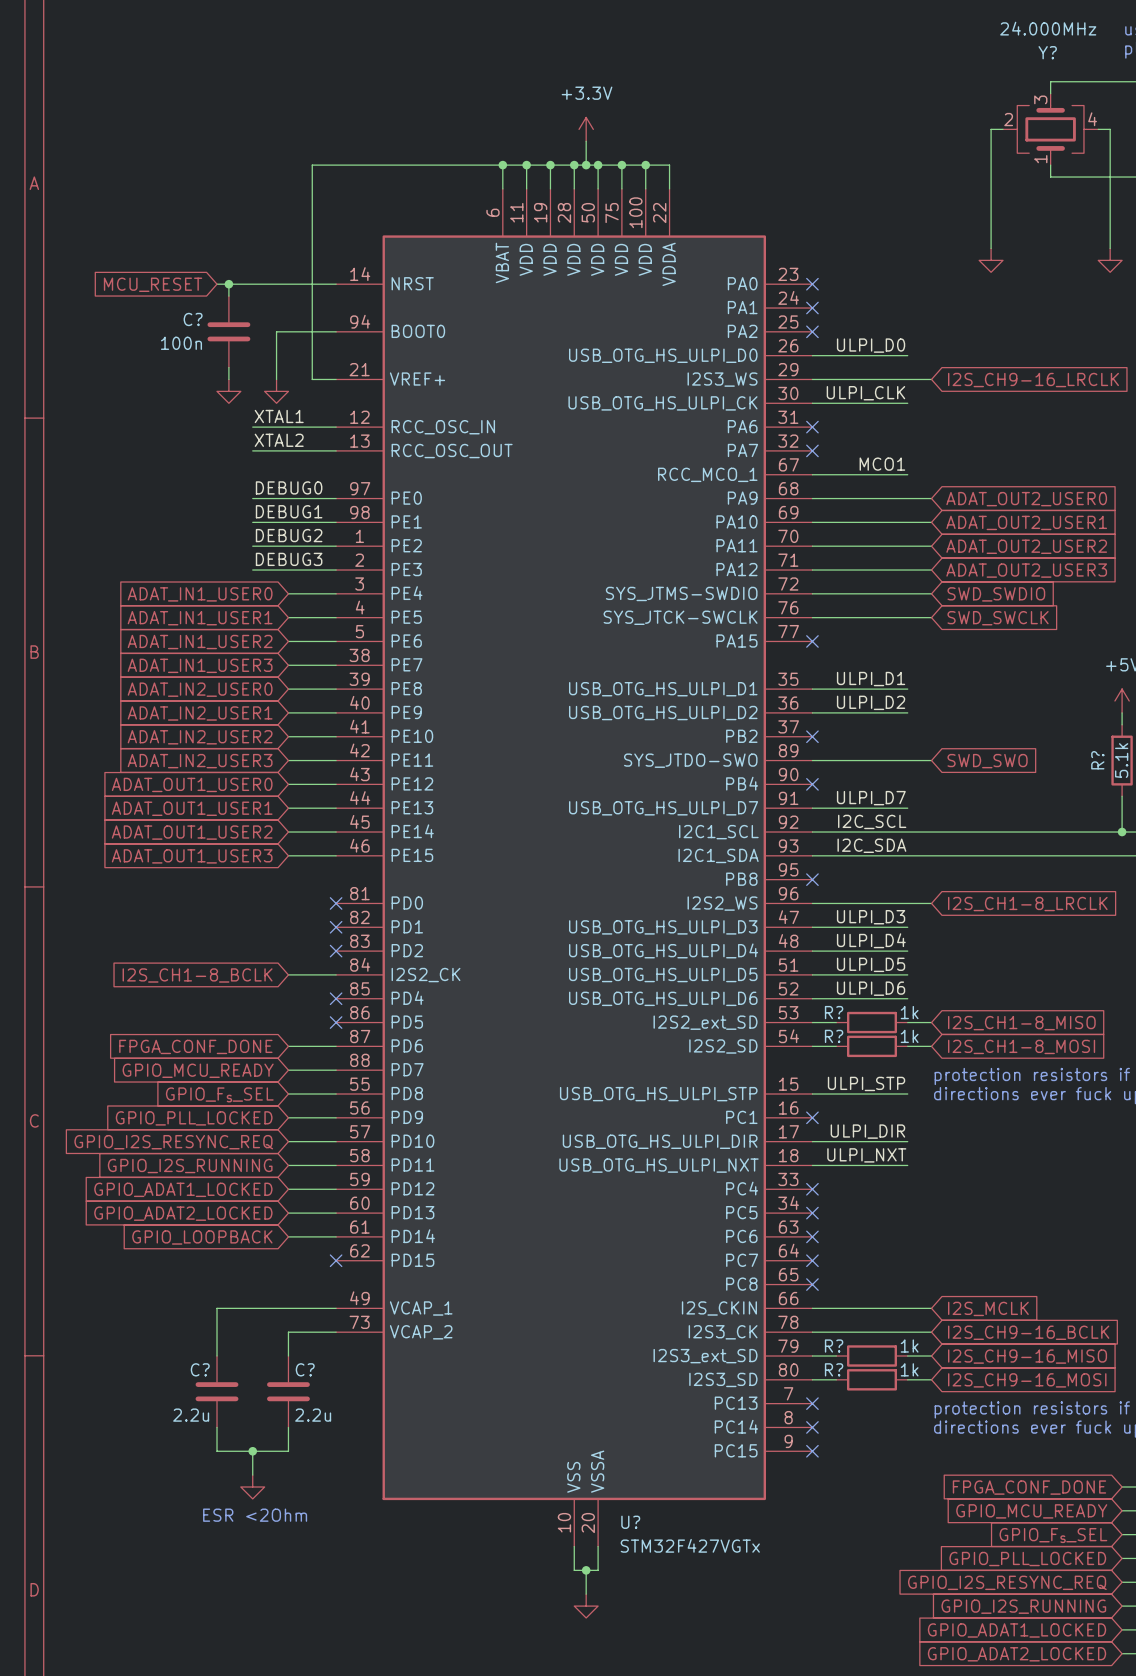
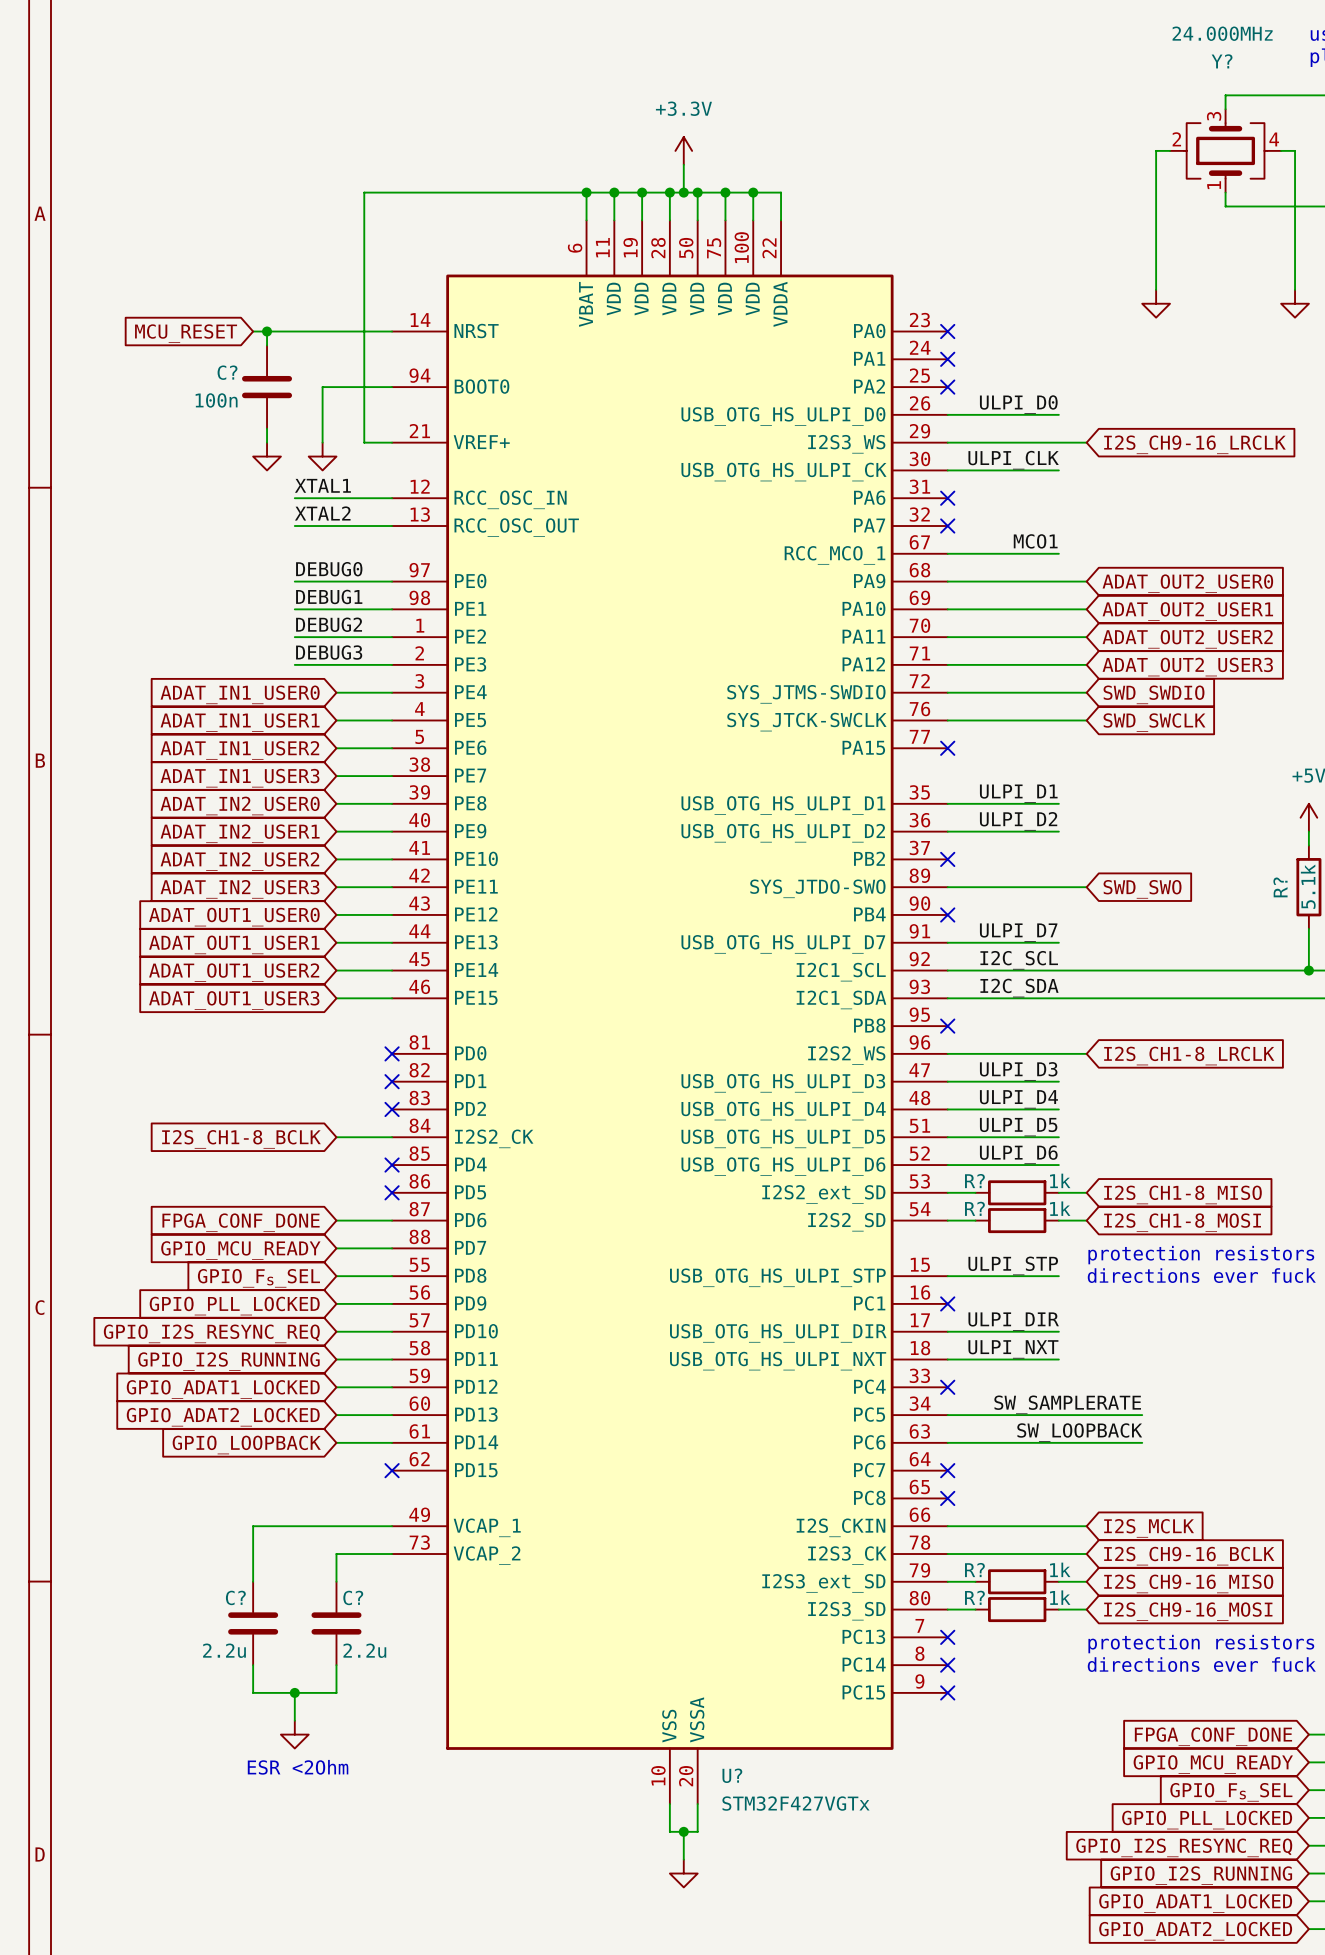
label: none -> SW_SAMPLERATE (1067, 1404)
wire: none -> (947, 1415) (1142, 1415)
no-connect mark: (812, 1213) -> none
label: none -> SW_LOOPBACK (1079, 1432)
wire: none -> (947, 1442) (1142, 1442)
no-connect mark: (812, 1236) -> none

